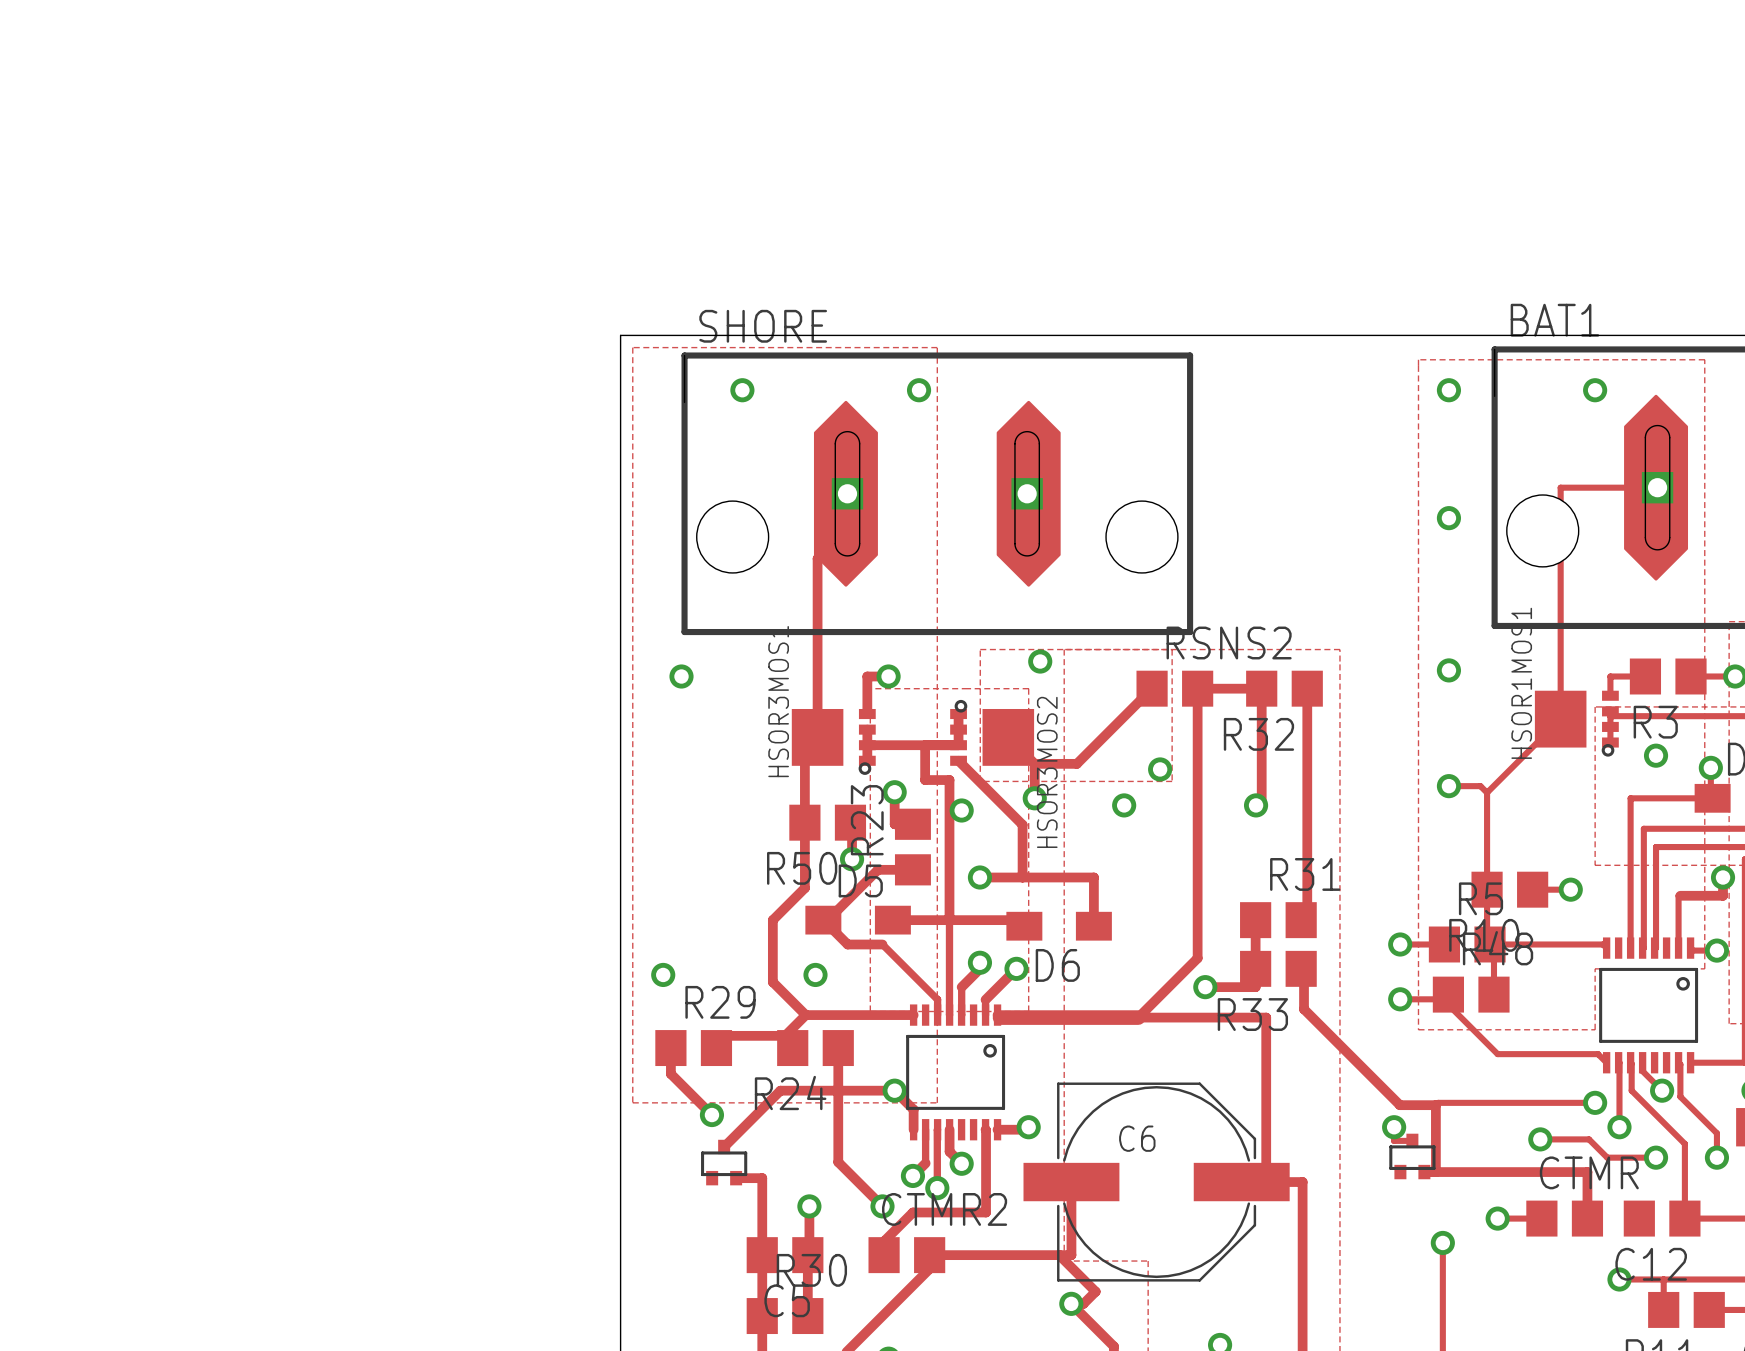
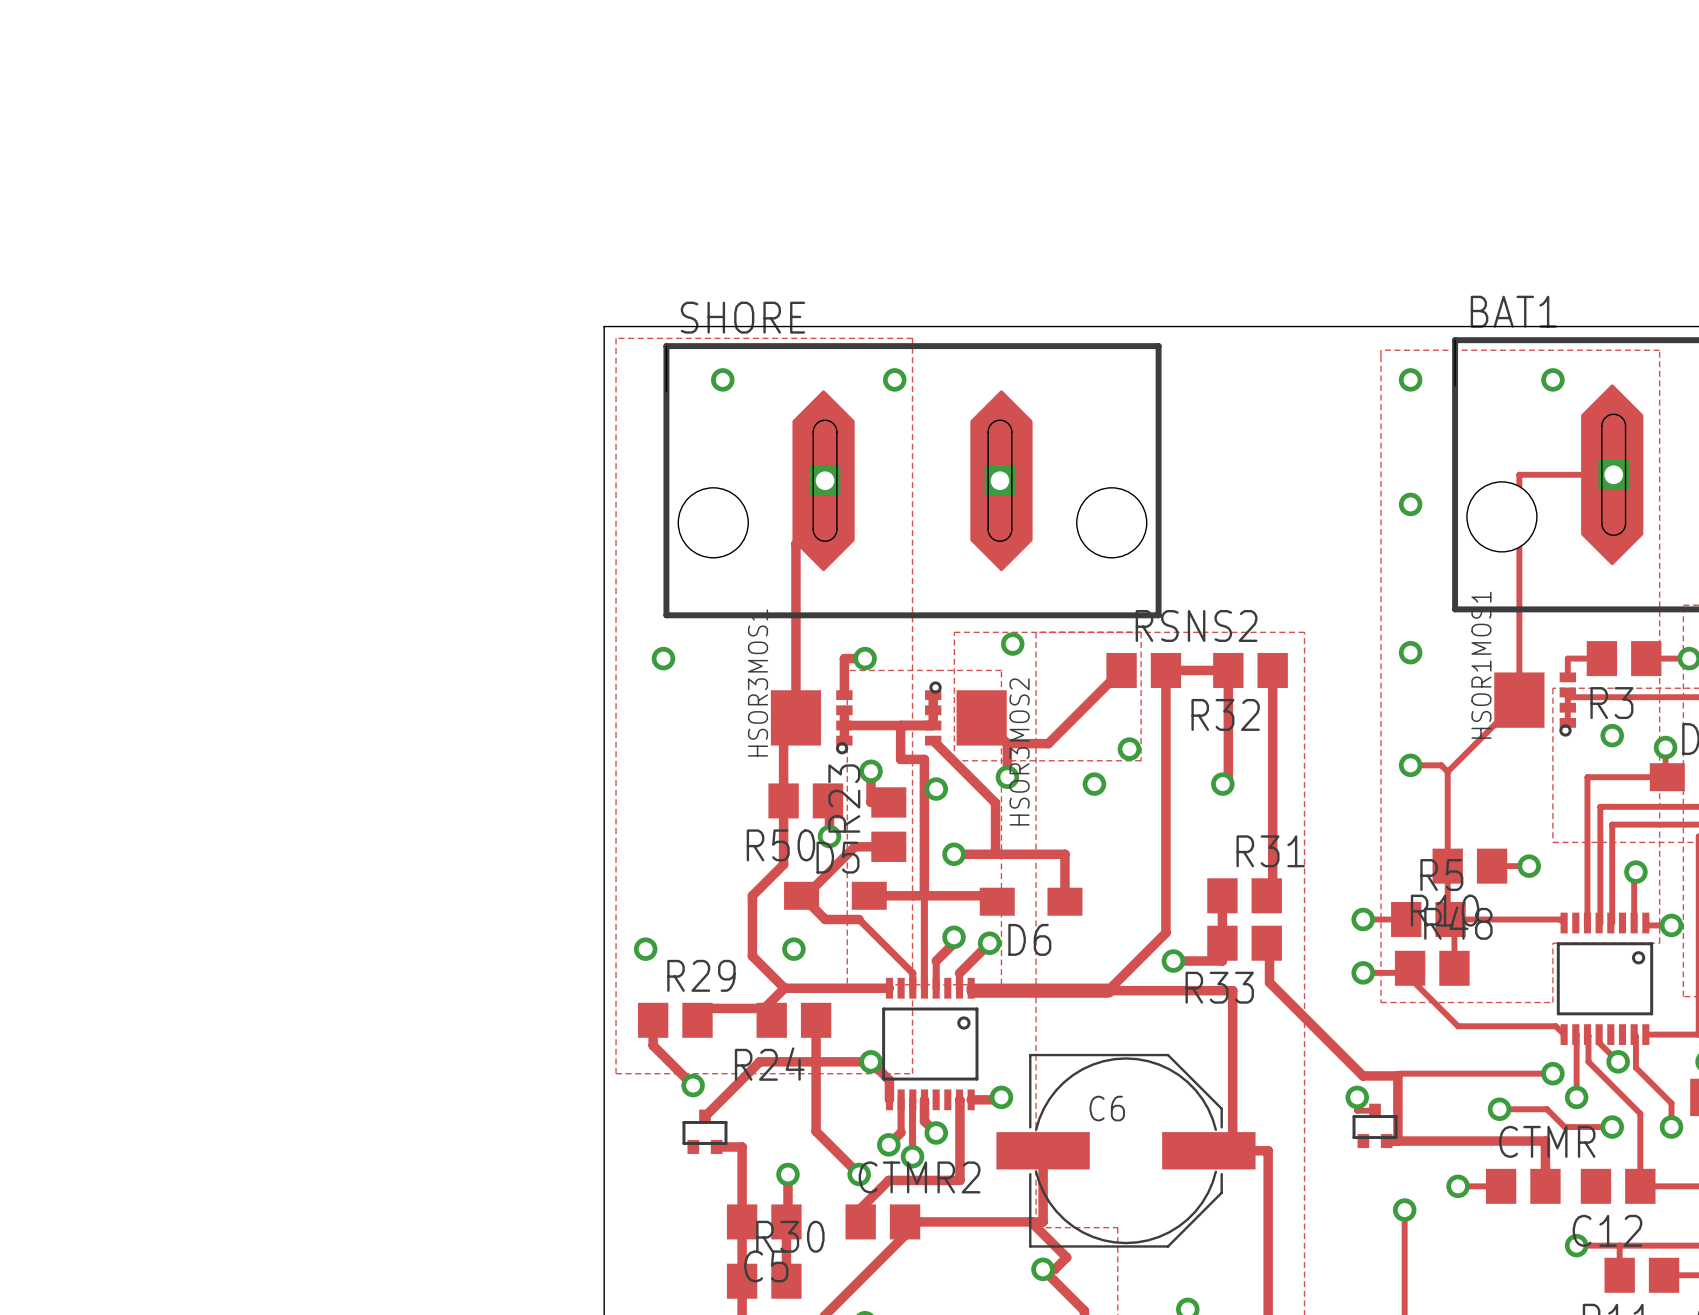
track: (1723, 877) (1723, 895) (1680, 895) -> none
via position: (1723, 877) -> (1635, 872)

